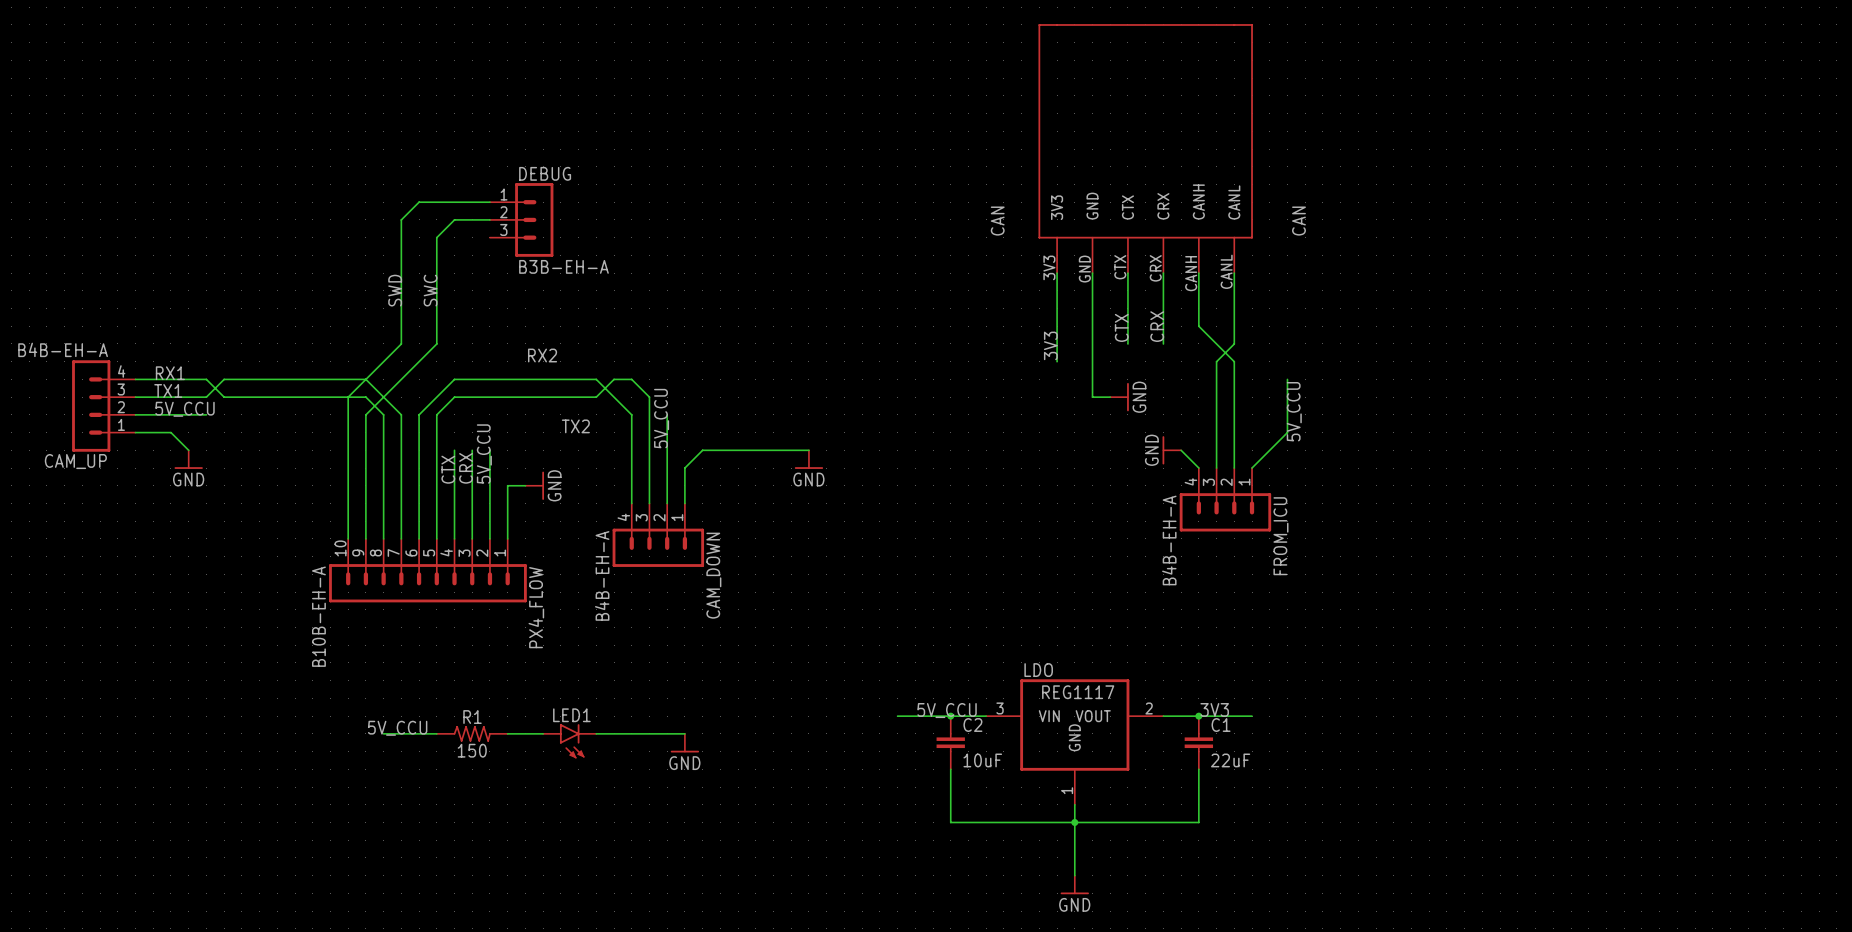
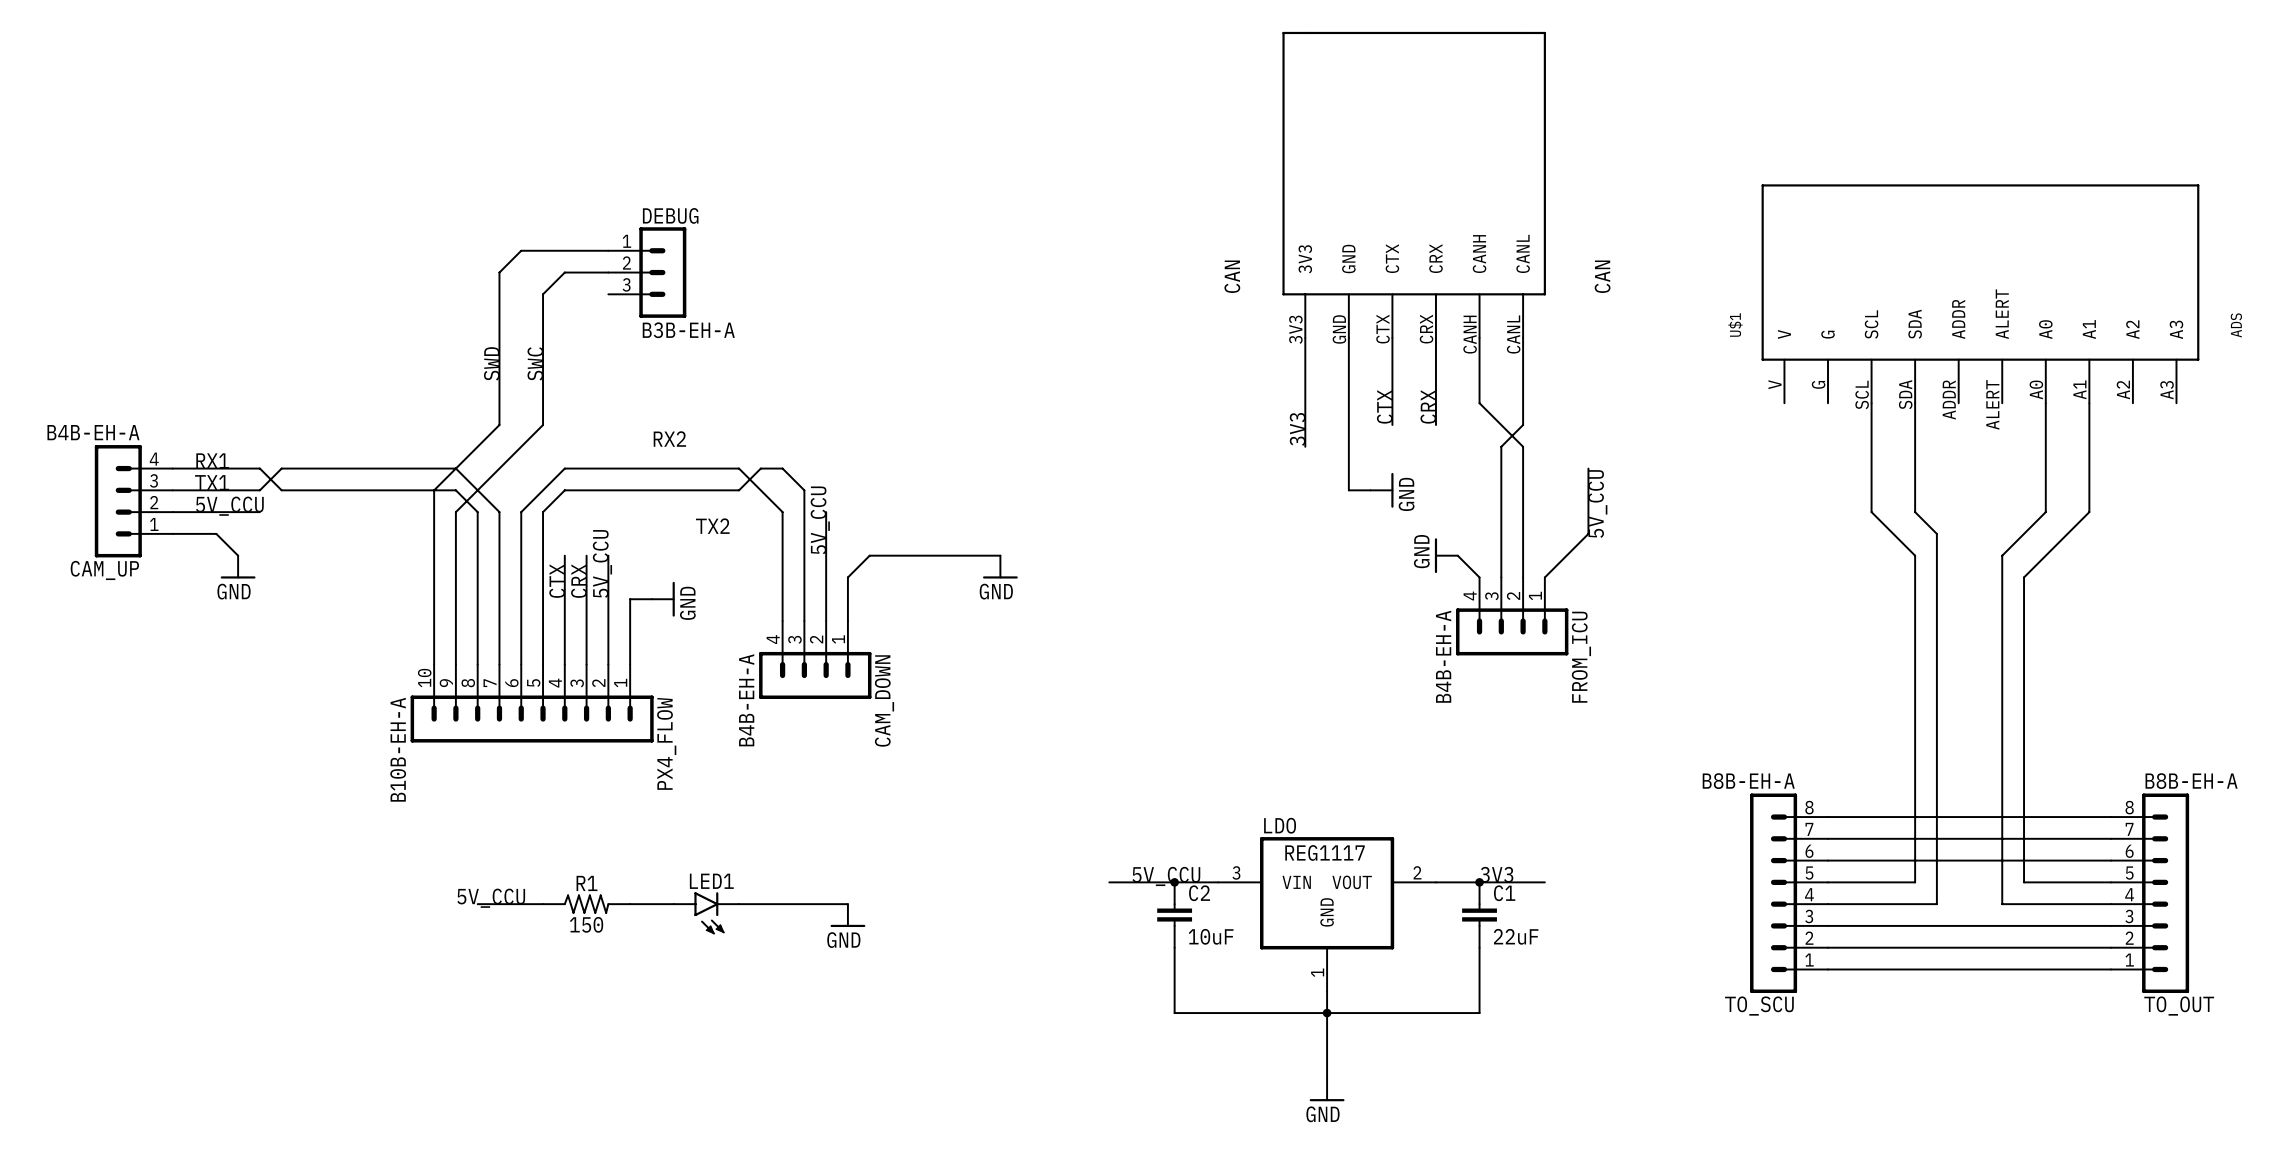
U$1: none -> ADS (1980, 293)
wire: none -> (1871, 403) (1871, 512) (1915, 555) (1915, 882) (1828, 882)
wire: none -> (1915, 403) (1915, 512) (1936, 533) (1936, 904) (1828, 904)
wire: none -> (2045, 403) (2045, 512) (2002, 555) (2002, 904) (2111, 904)
wire: none -> (2089, 403) (2089, 512) (2024, 577) (2024, 882) (2111, 882)
wire: none -> (1828, 817) (2111, 817)
wire: none -> (1828, 838) (2111, 838)
wire: none -> (1828, 860) (2111, 860)
TO_SCU: none -> B8B-EH-A (1789, 893)
TO_OUT: none -> B8B-EH-A (2150, 893)
wire: none -> (1828, 925) (2111, 925)
wire: none -> (1828, 947) (2111, 947)
wire: none -> (1828, 969) (2111, 969)

